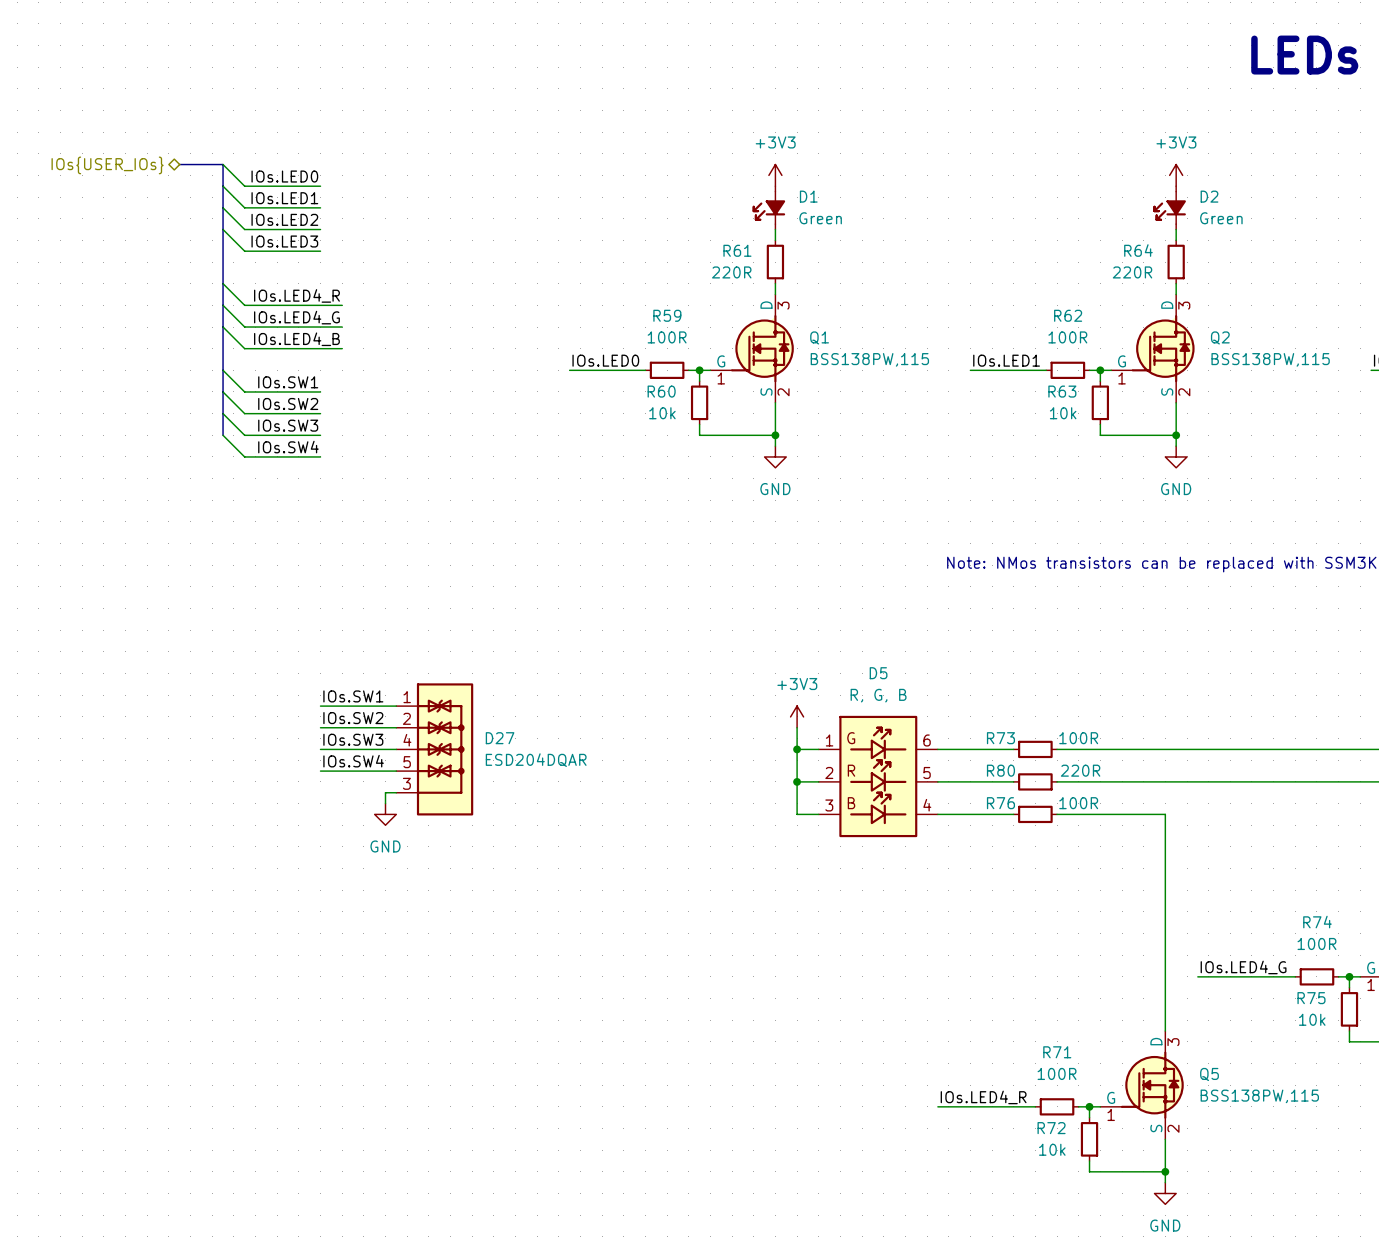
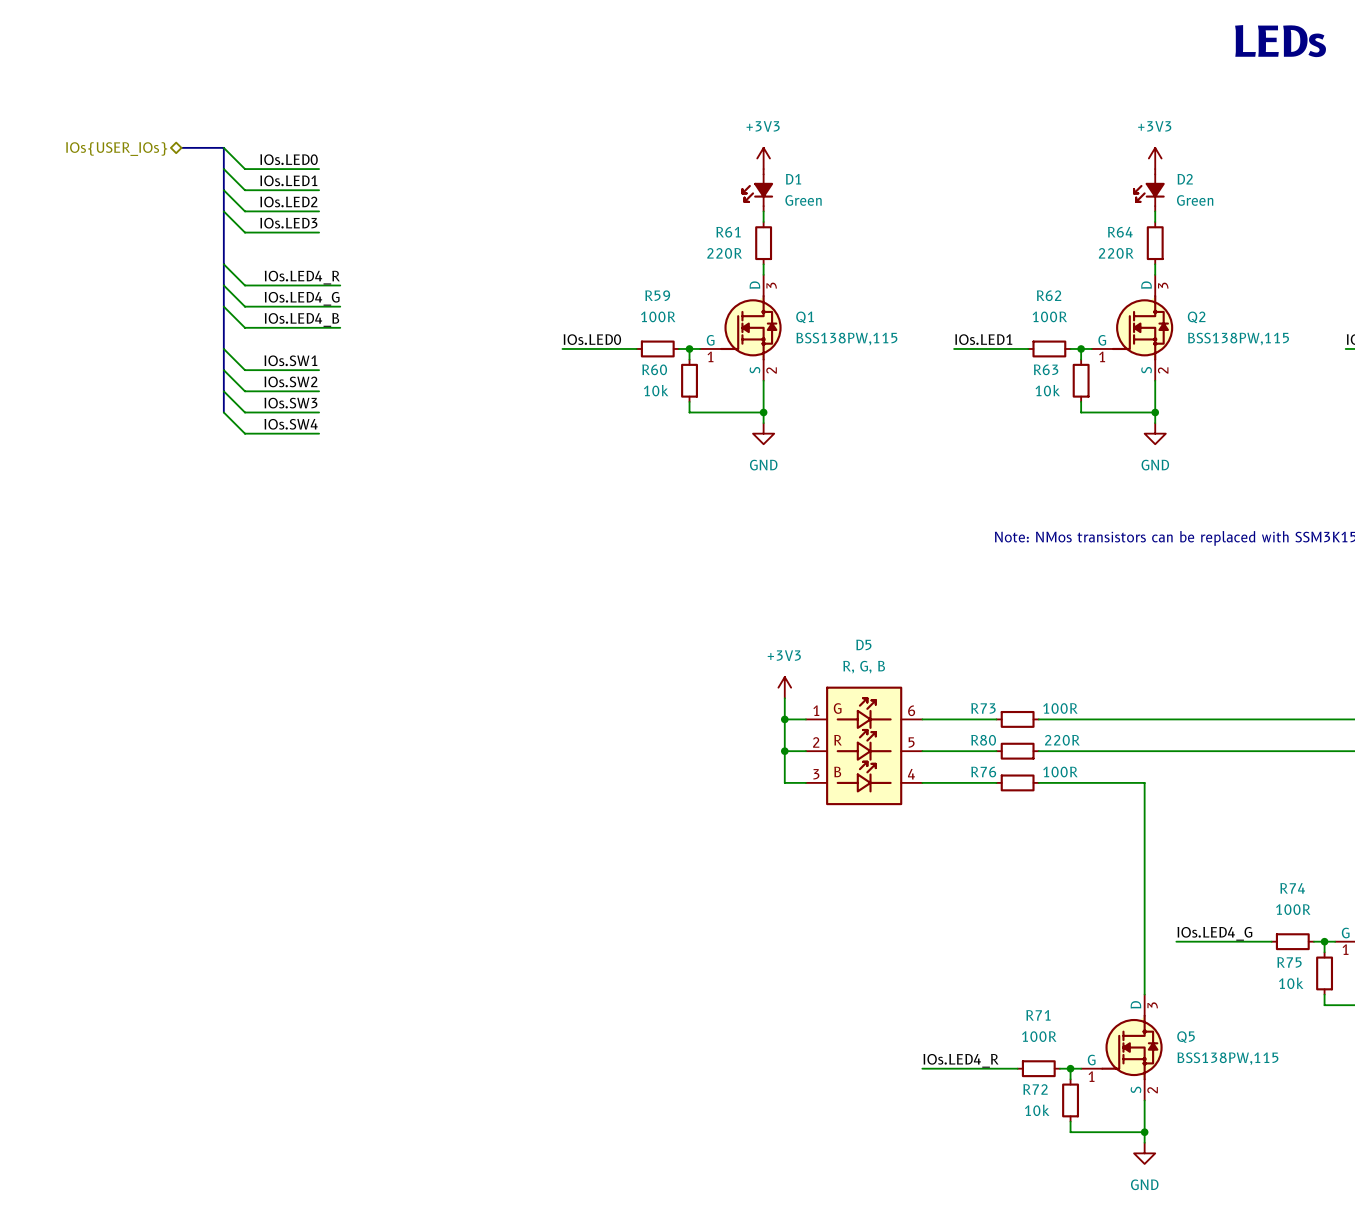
label: IOs.SW1 (353, 696) -> none
wire: (320, 706) (396, 706) -> none
label: IOs.SW2 (353, 718) -> none
wire: (320, 727) (396, 727) -> none
label: IOs.SW3 (353, 739) -> none
wire: (320, 749) (396, 749) -> none
D27: (434, 749) -> none
label: IOs.SW4 (353, 761) -> none
wire: (320, 771) (396, 771) -> none
wire: (396, 792) (385, 792) (385, 803) -> none
power symbol: GND (385, 814) -> none

